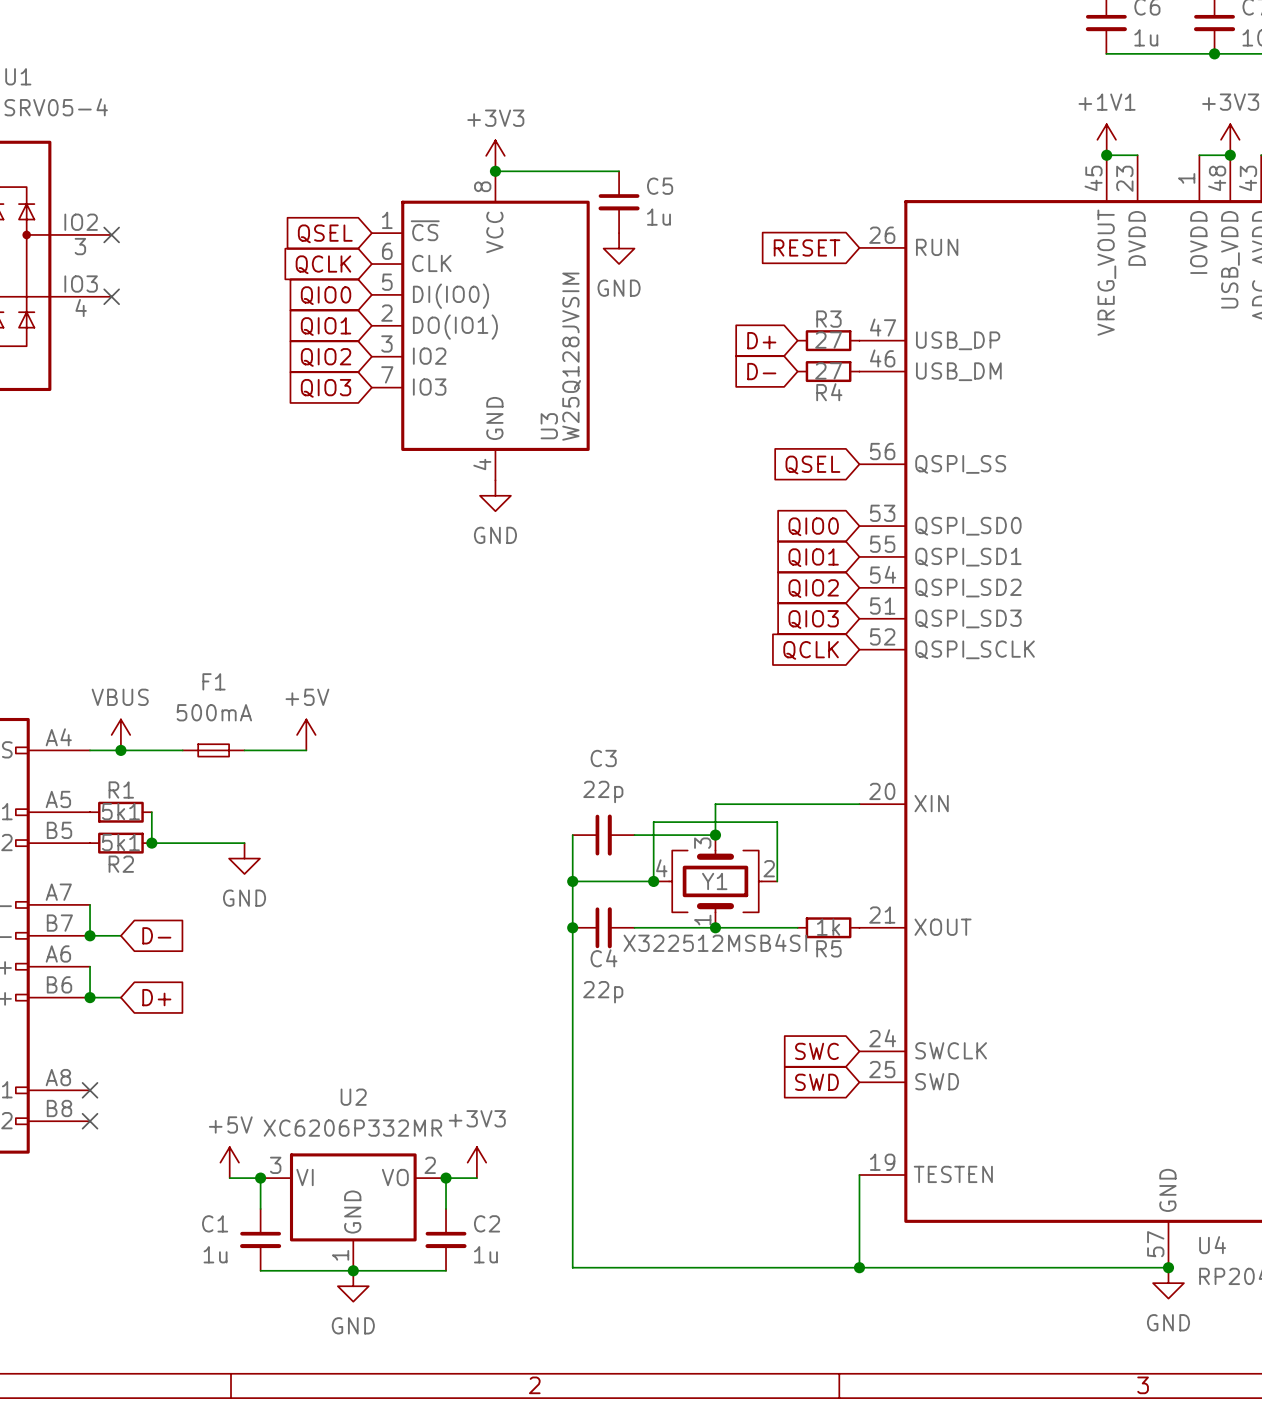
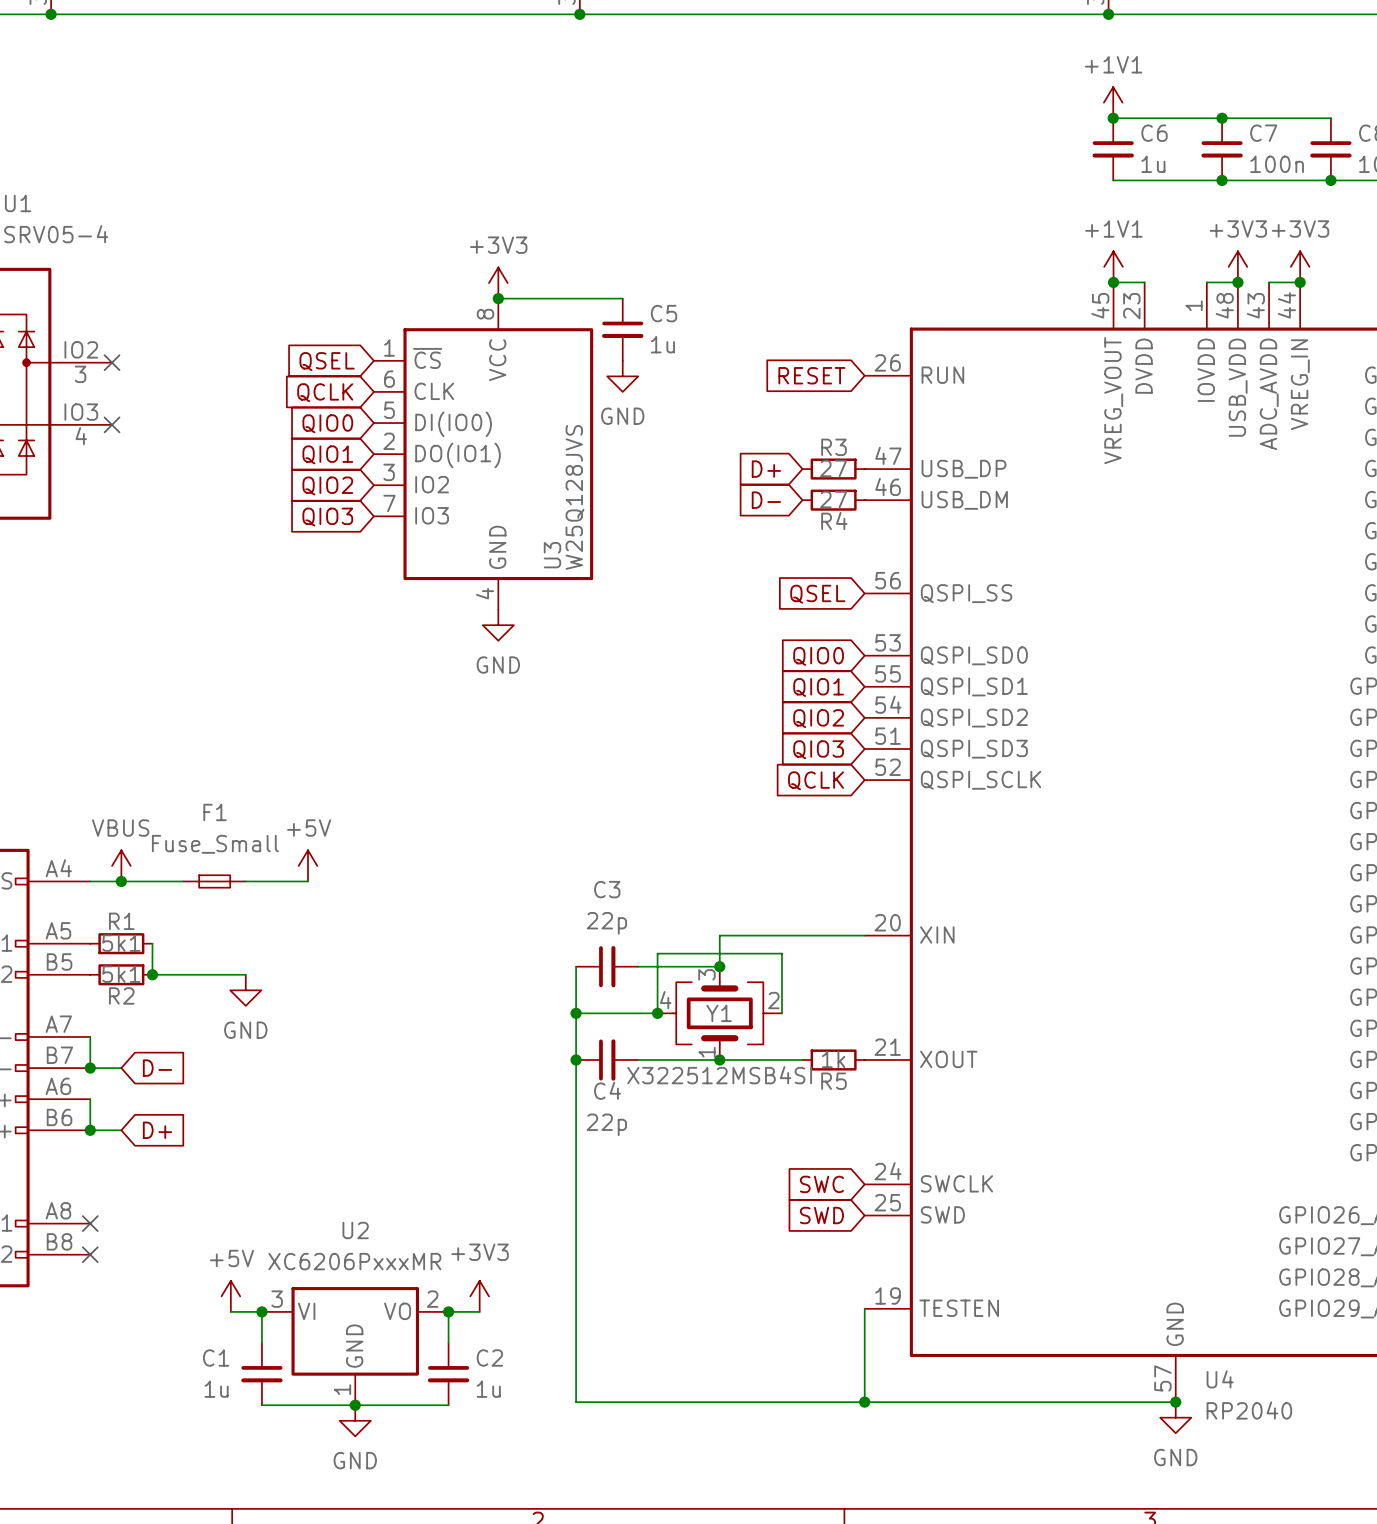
U3 value: W25Q128JVSIM (571, 356) -> W25Q128JVS (575, 497)
F1 value: 500mA (214, 712) -> Fuse_Small (215, 844)
U2 value: XC6206P332MR (352, 1128) -> XC6206PxxxMR (354, 1261)

